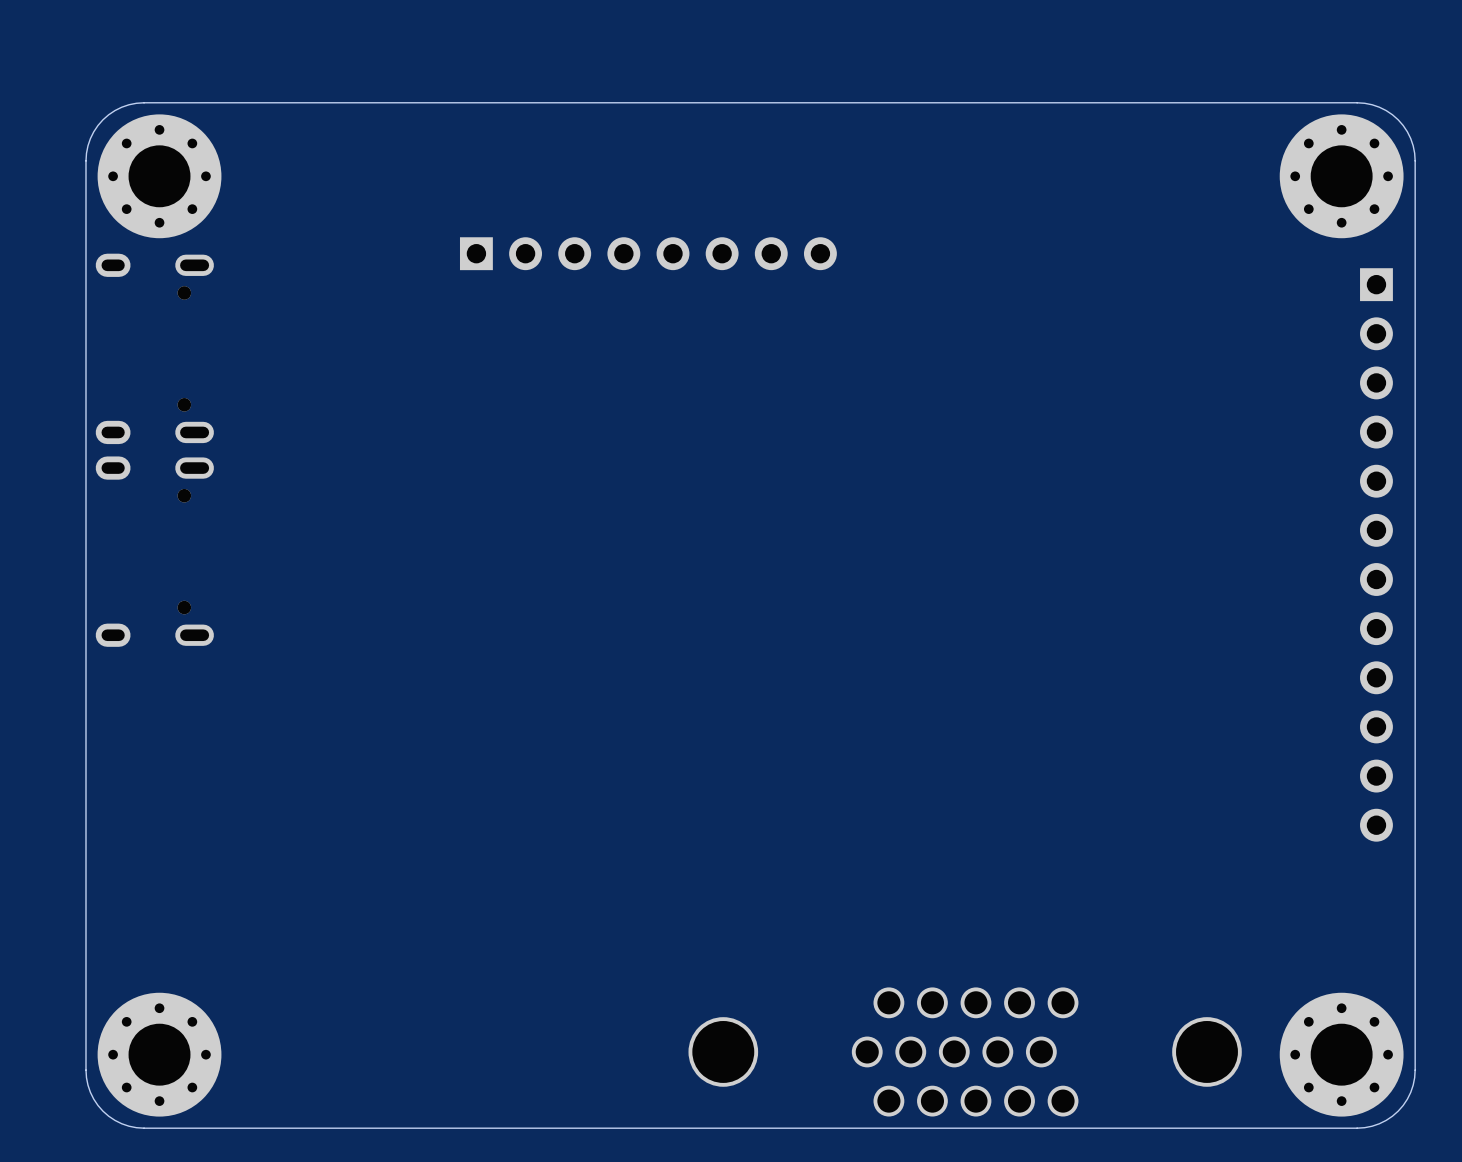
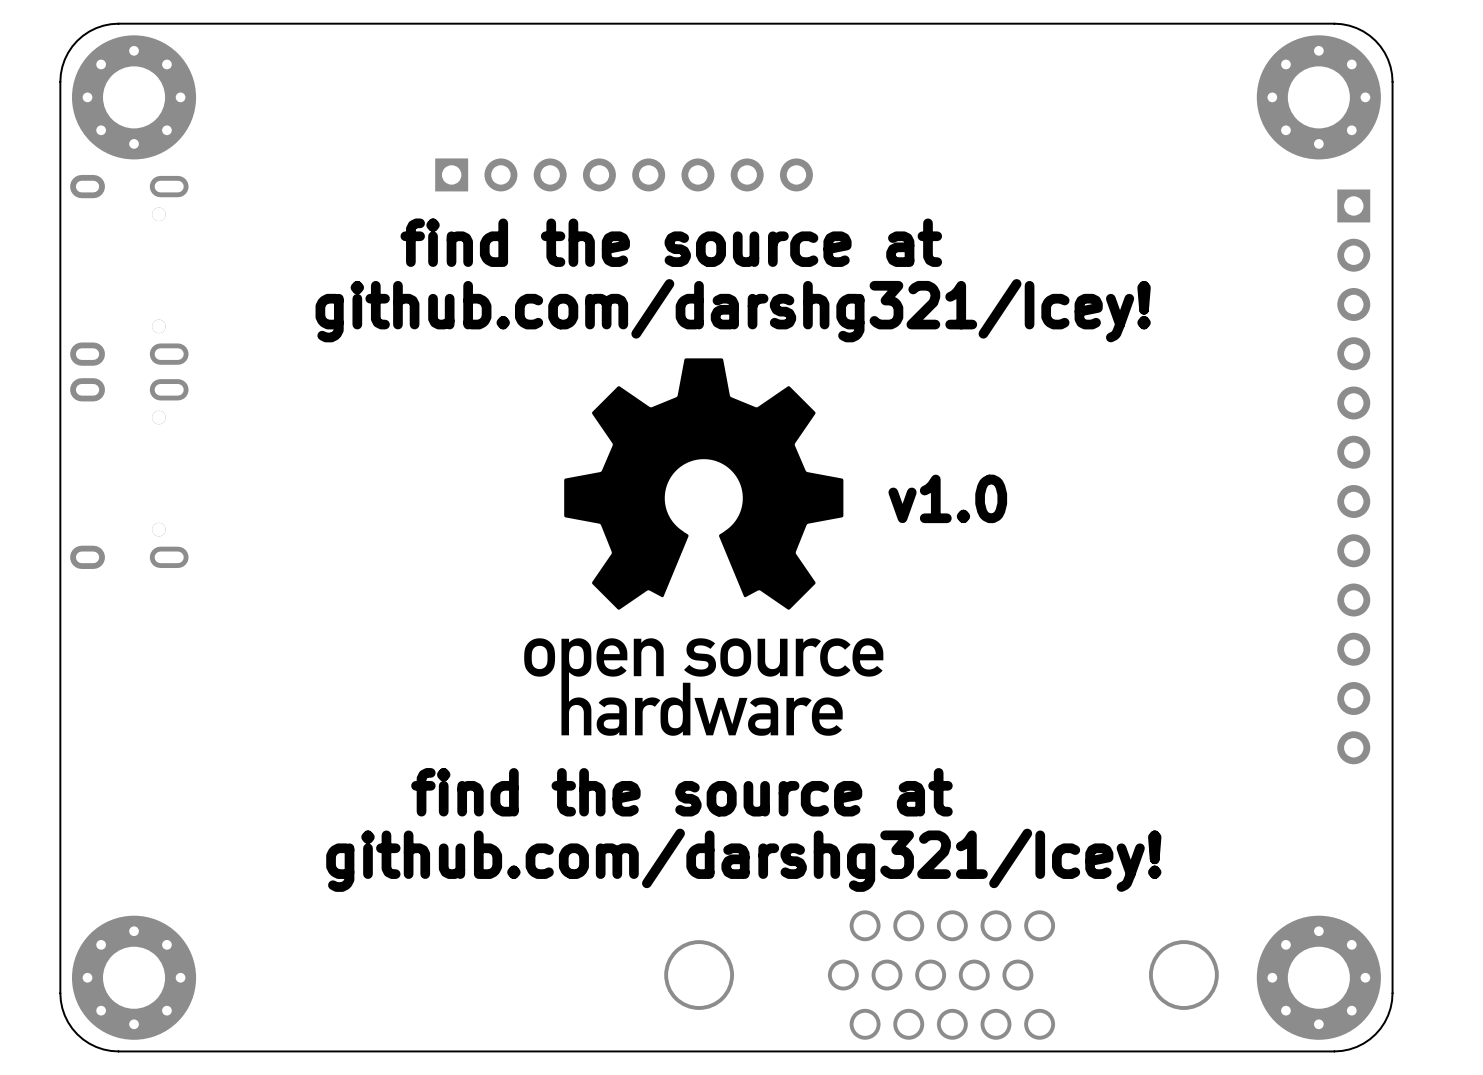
text: none -> find the source at (671, 242)
text: none -> github.com/darshg321/Icey! (733, 310)
drawing: none -> [564, 358, 844, 610]
text: none -> v1.0 (947, 498)
drawing: none -> [524, 638, 884, 736]
text: none -> find the source at (681, 792)
text: none -> github.com/darshg321/Icey! (743, 860)

